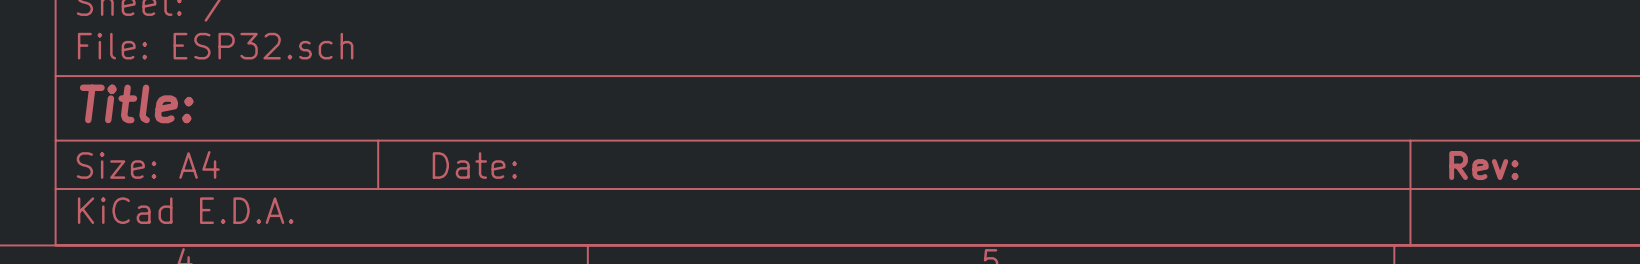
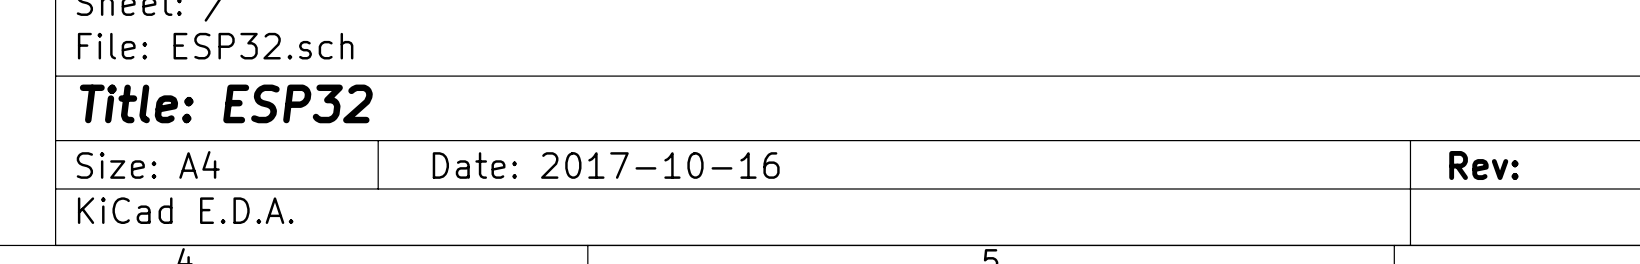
title block: Title: (136, 103) -> Title: ESP32 (226, 103)
title block: Date: (474, 165) -> Date: 2017-10-16 (606, 165)

